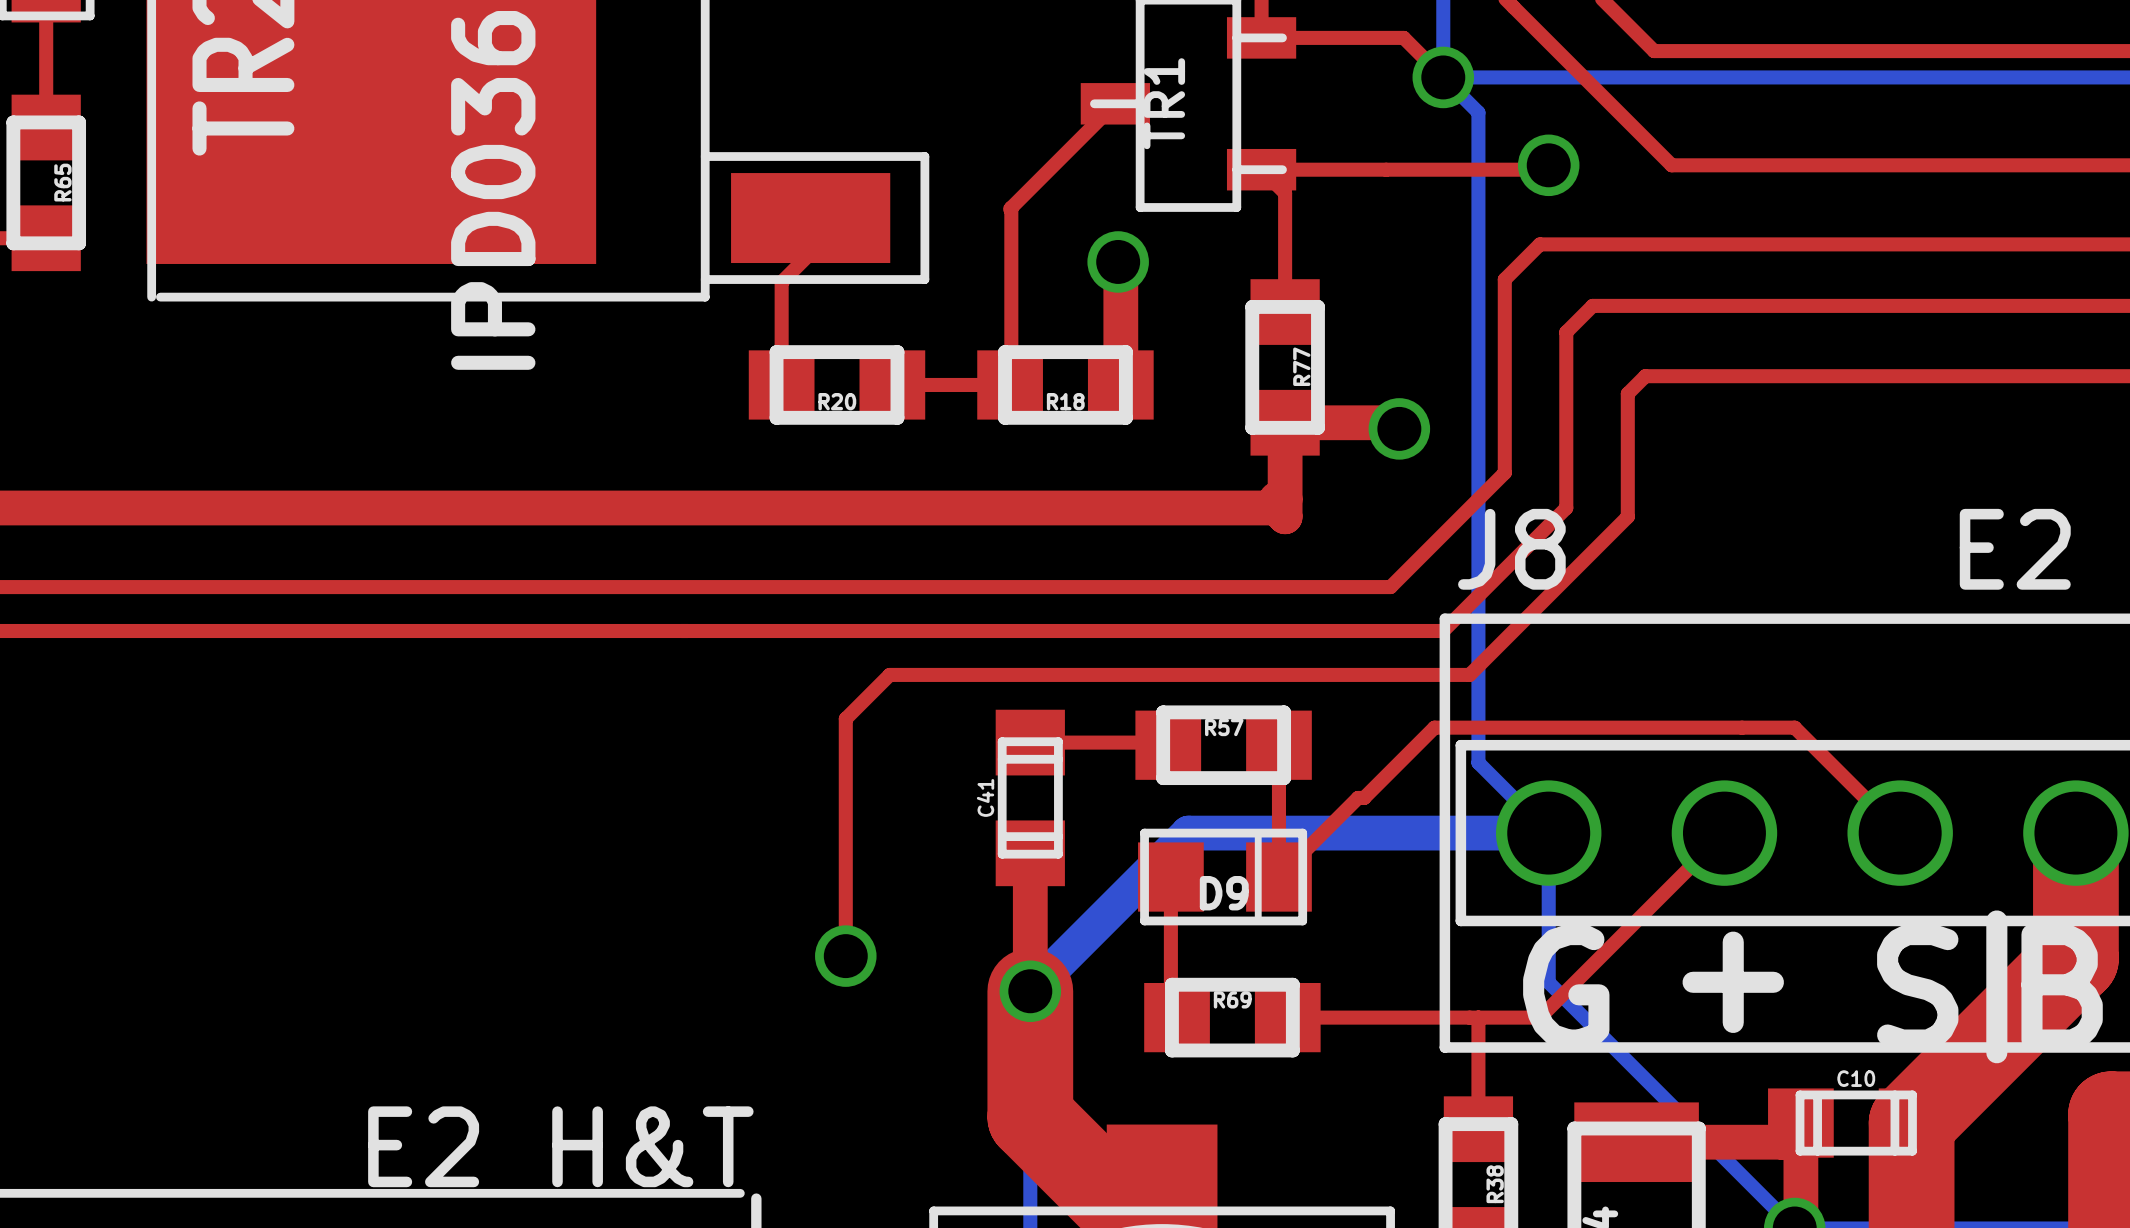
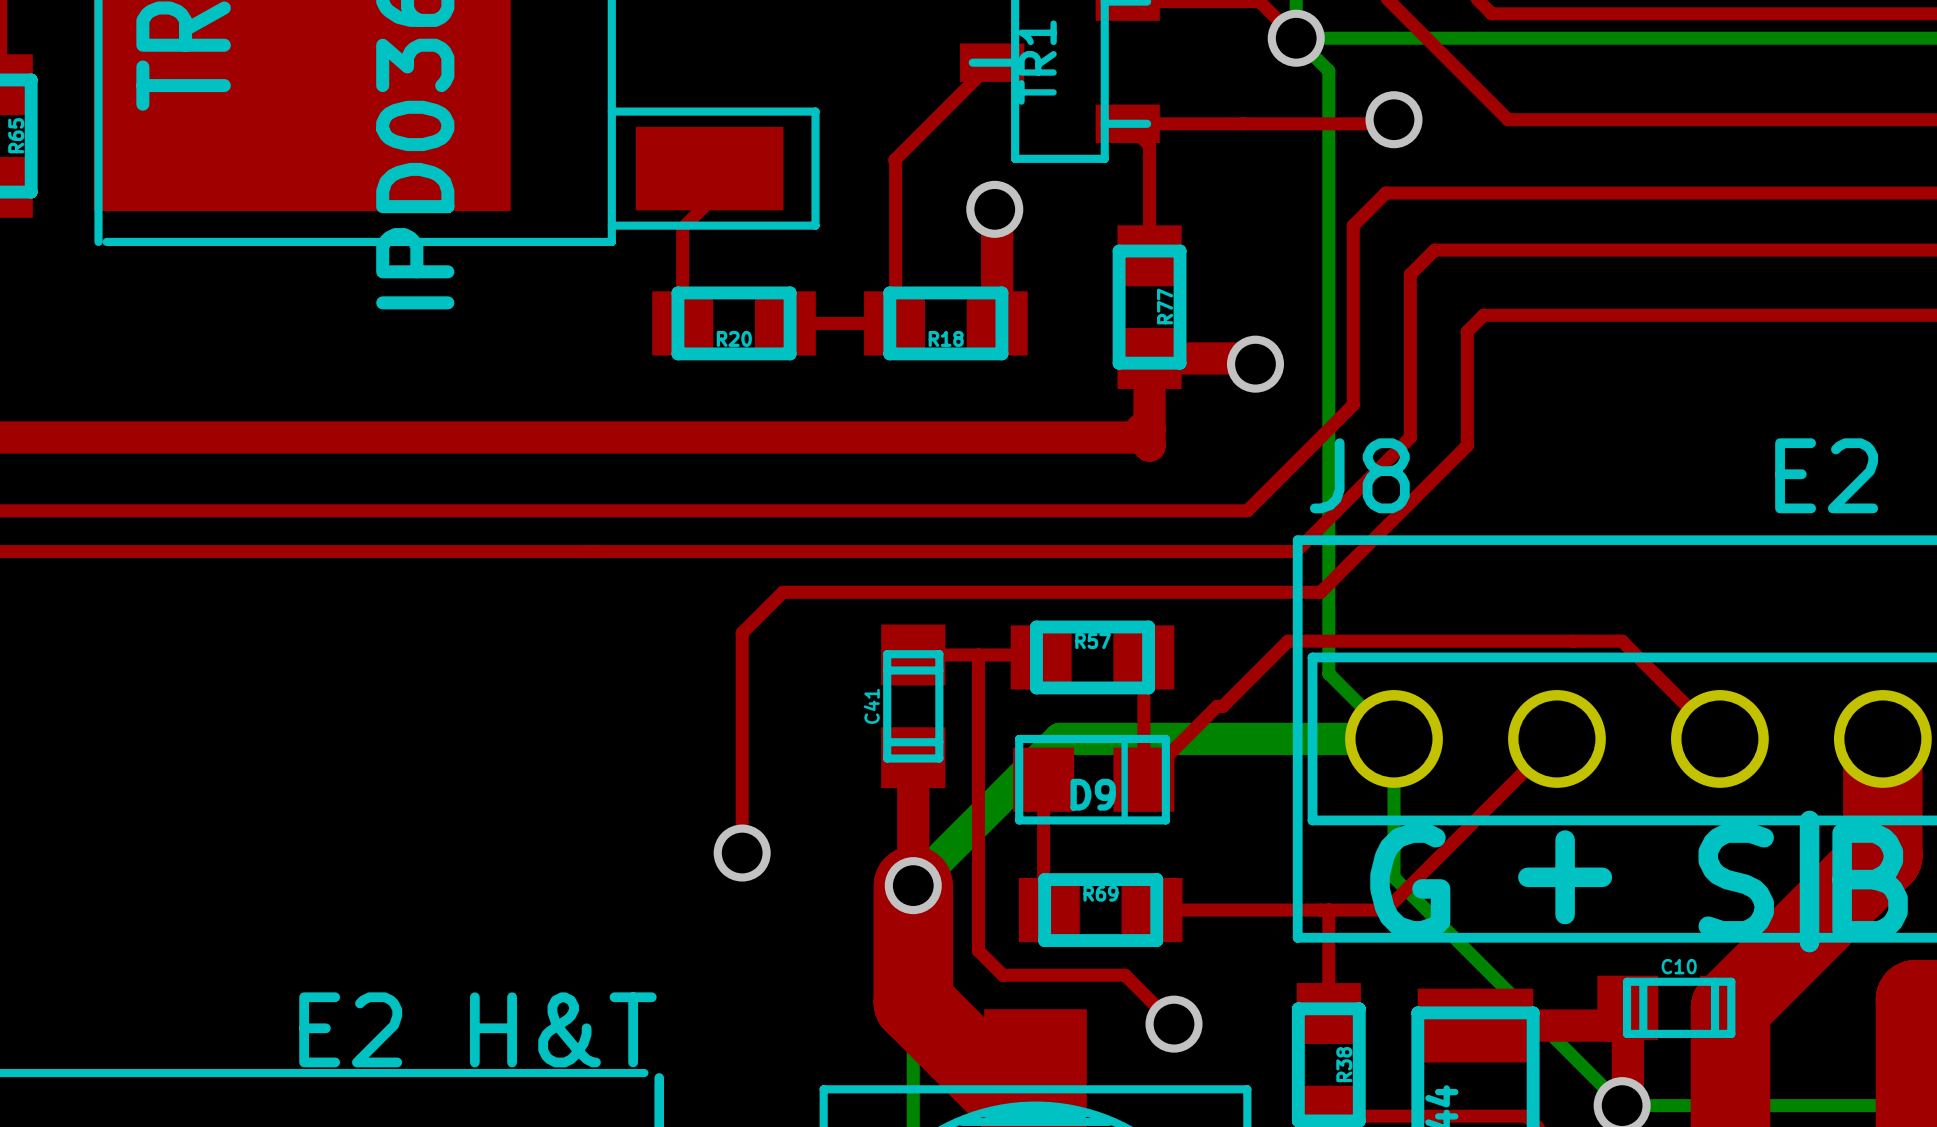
top track: none -> (978, 655) (978, 950) (1002, 975) (1125, 975) (1174, 1024)
via: none -> (1174, 1024)

